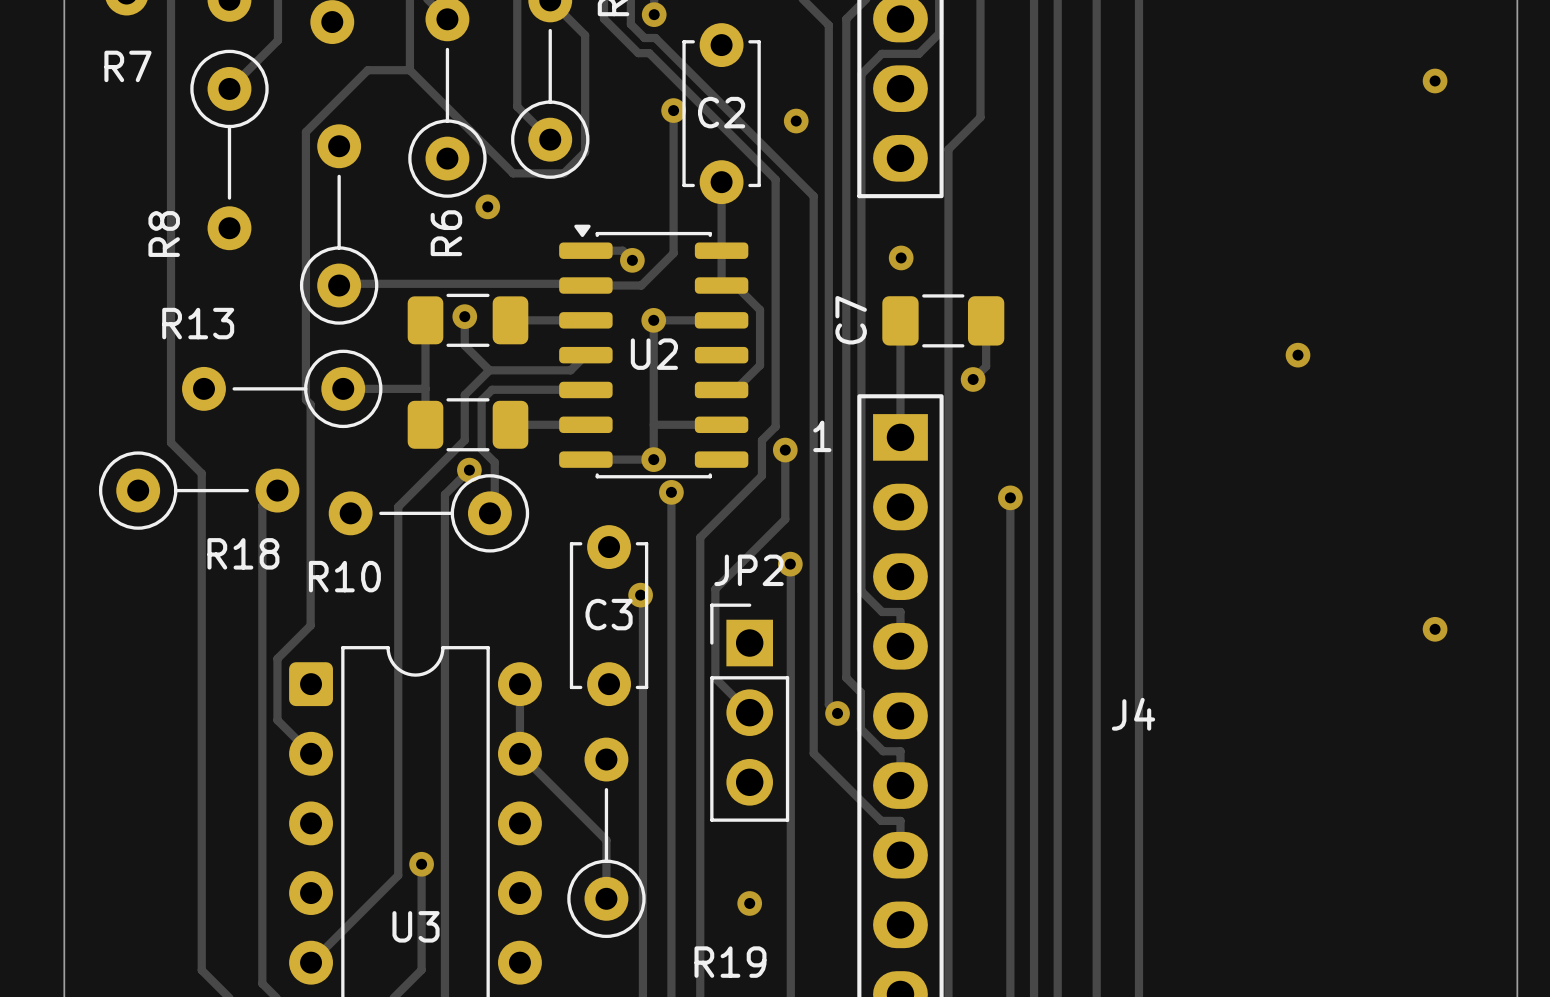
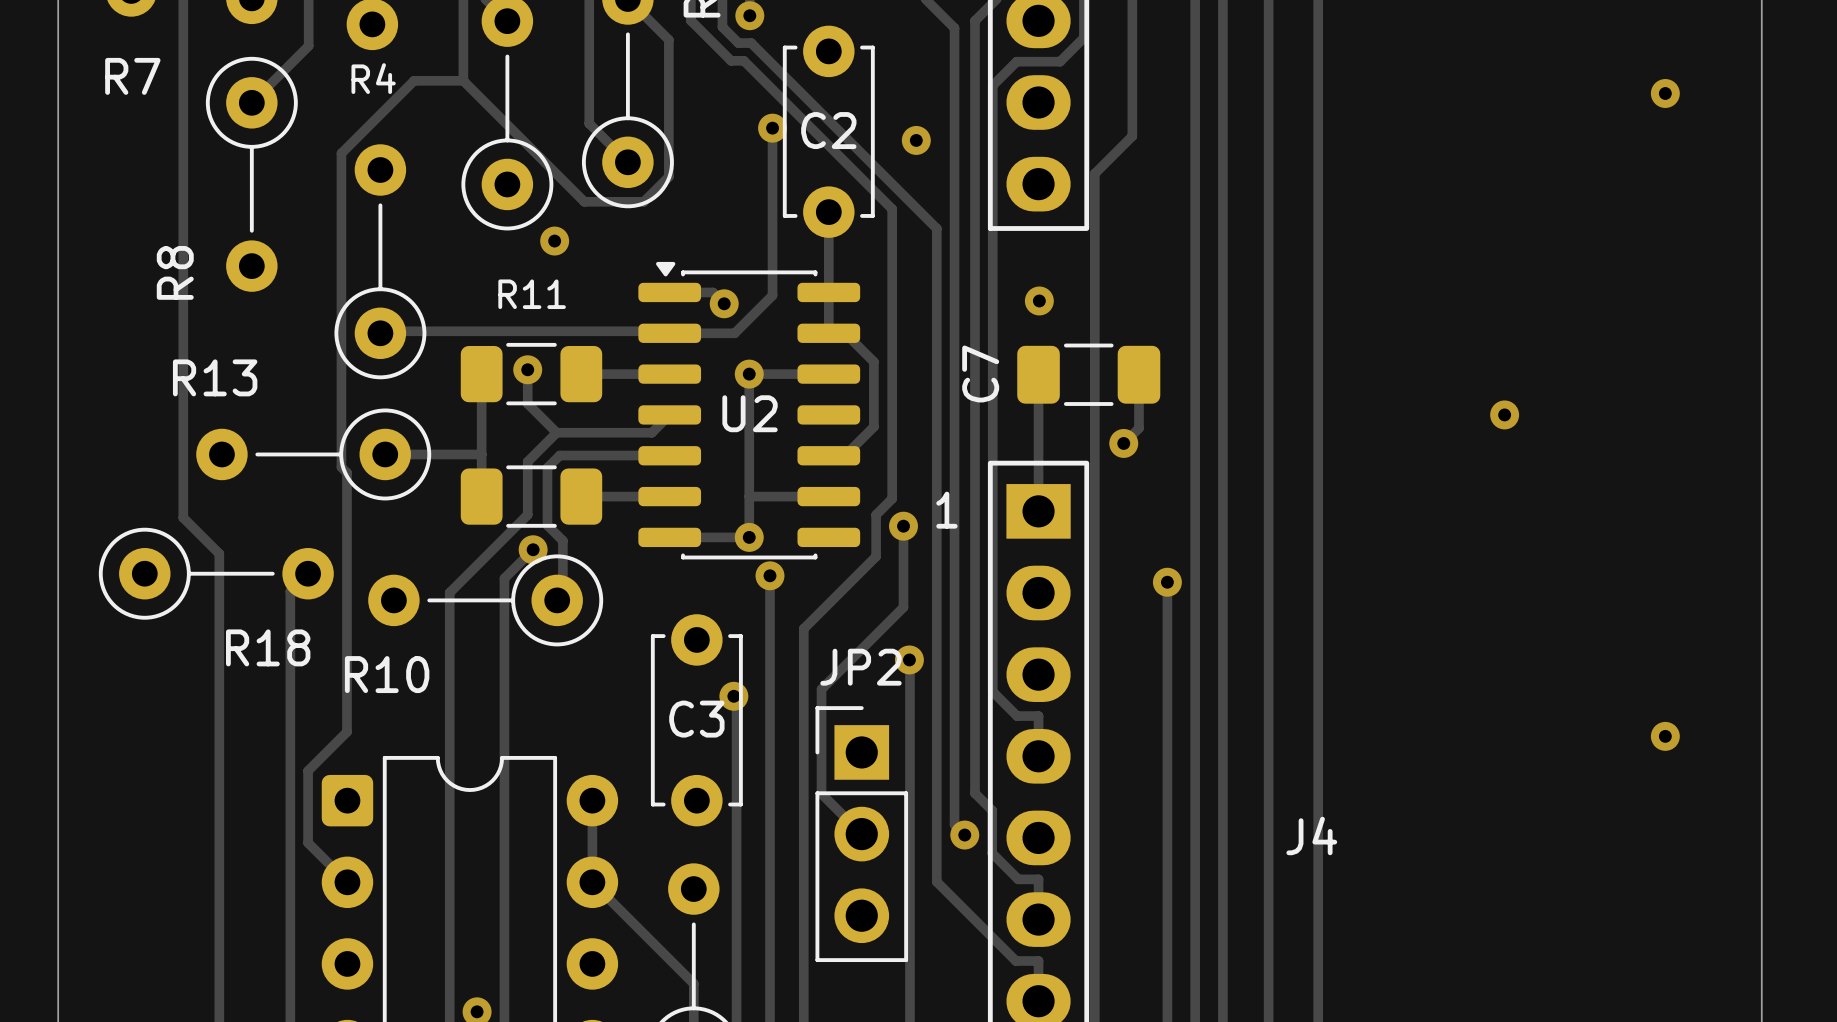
R4 name: none -> R4 (373, 78)
R6 name: R6 (446, 233) -> none
R11 name: none -> R11 (532, 294)

